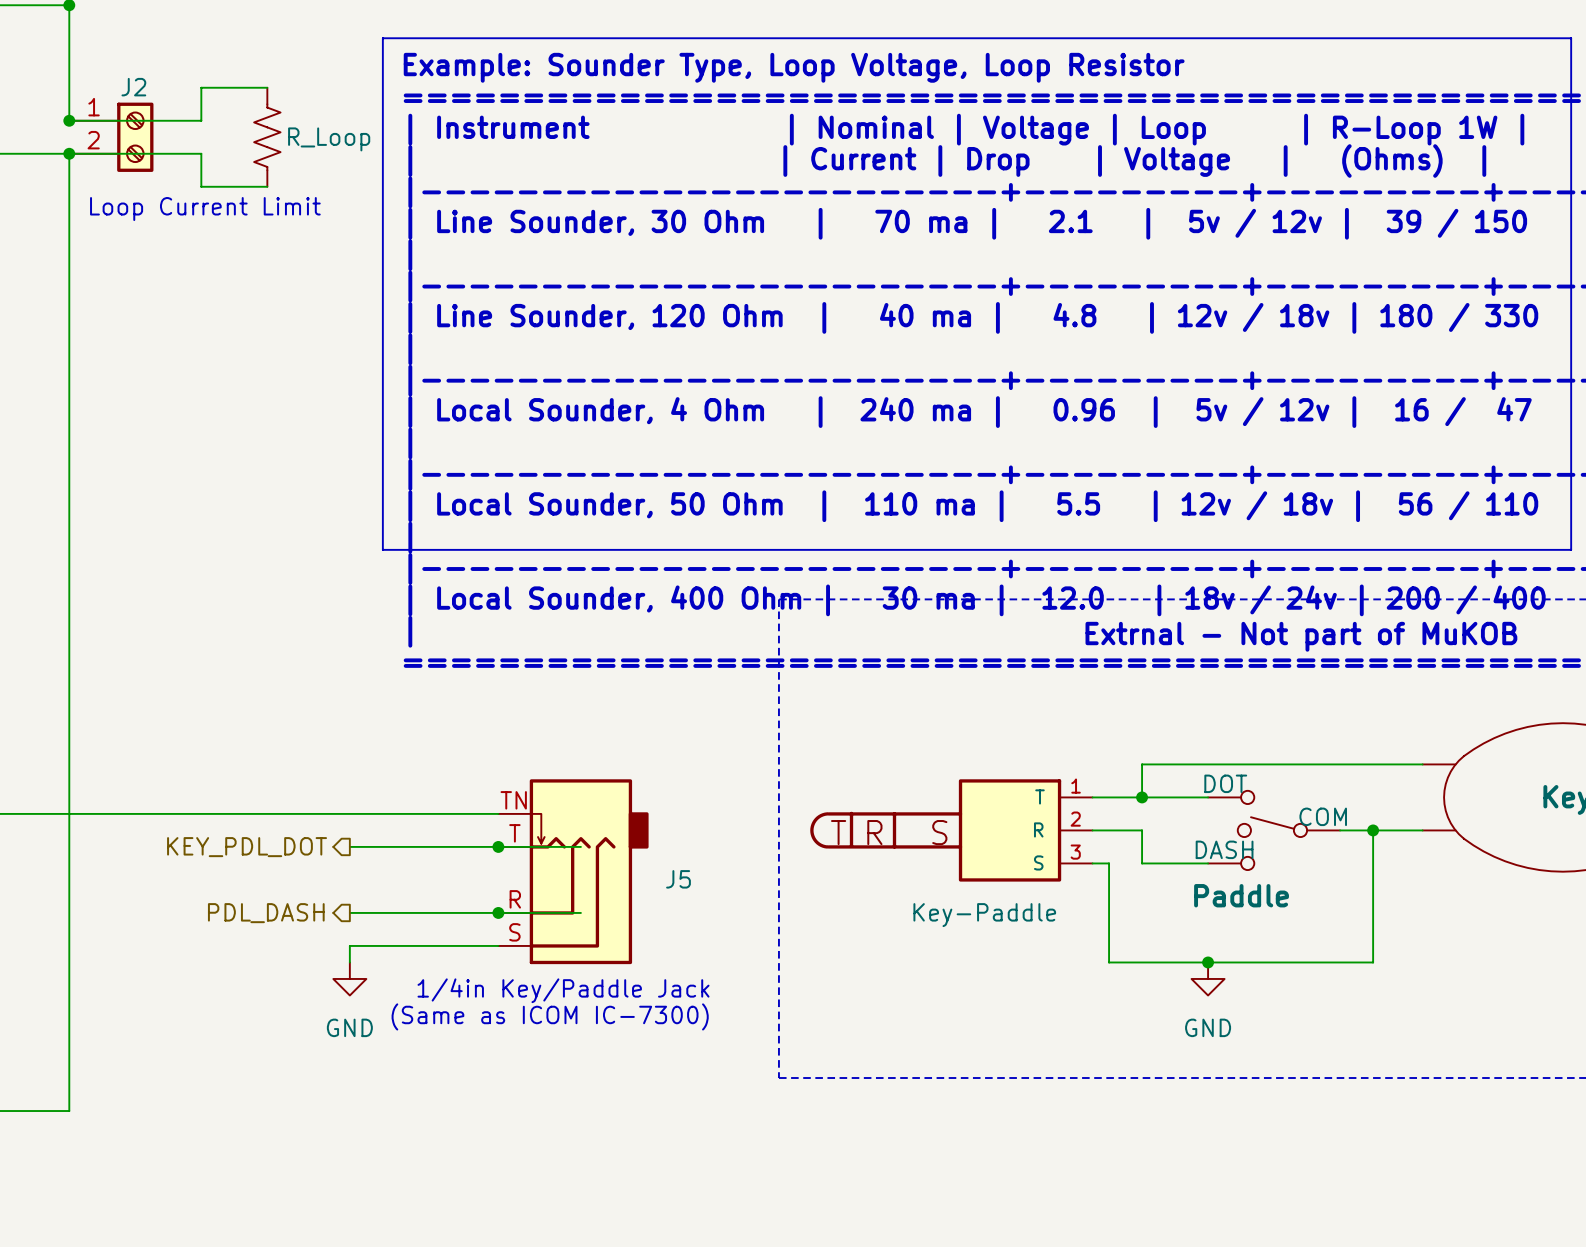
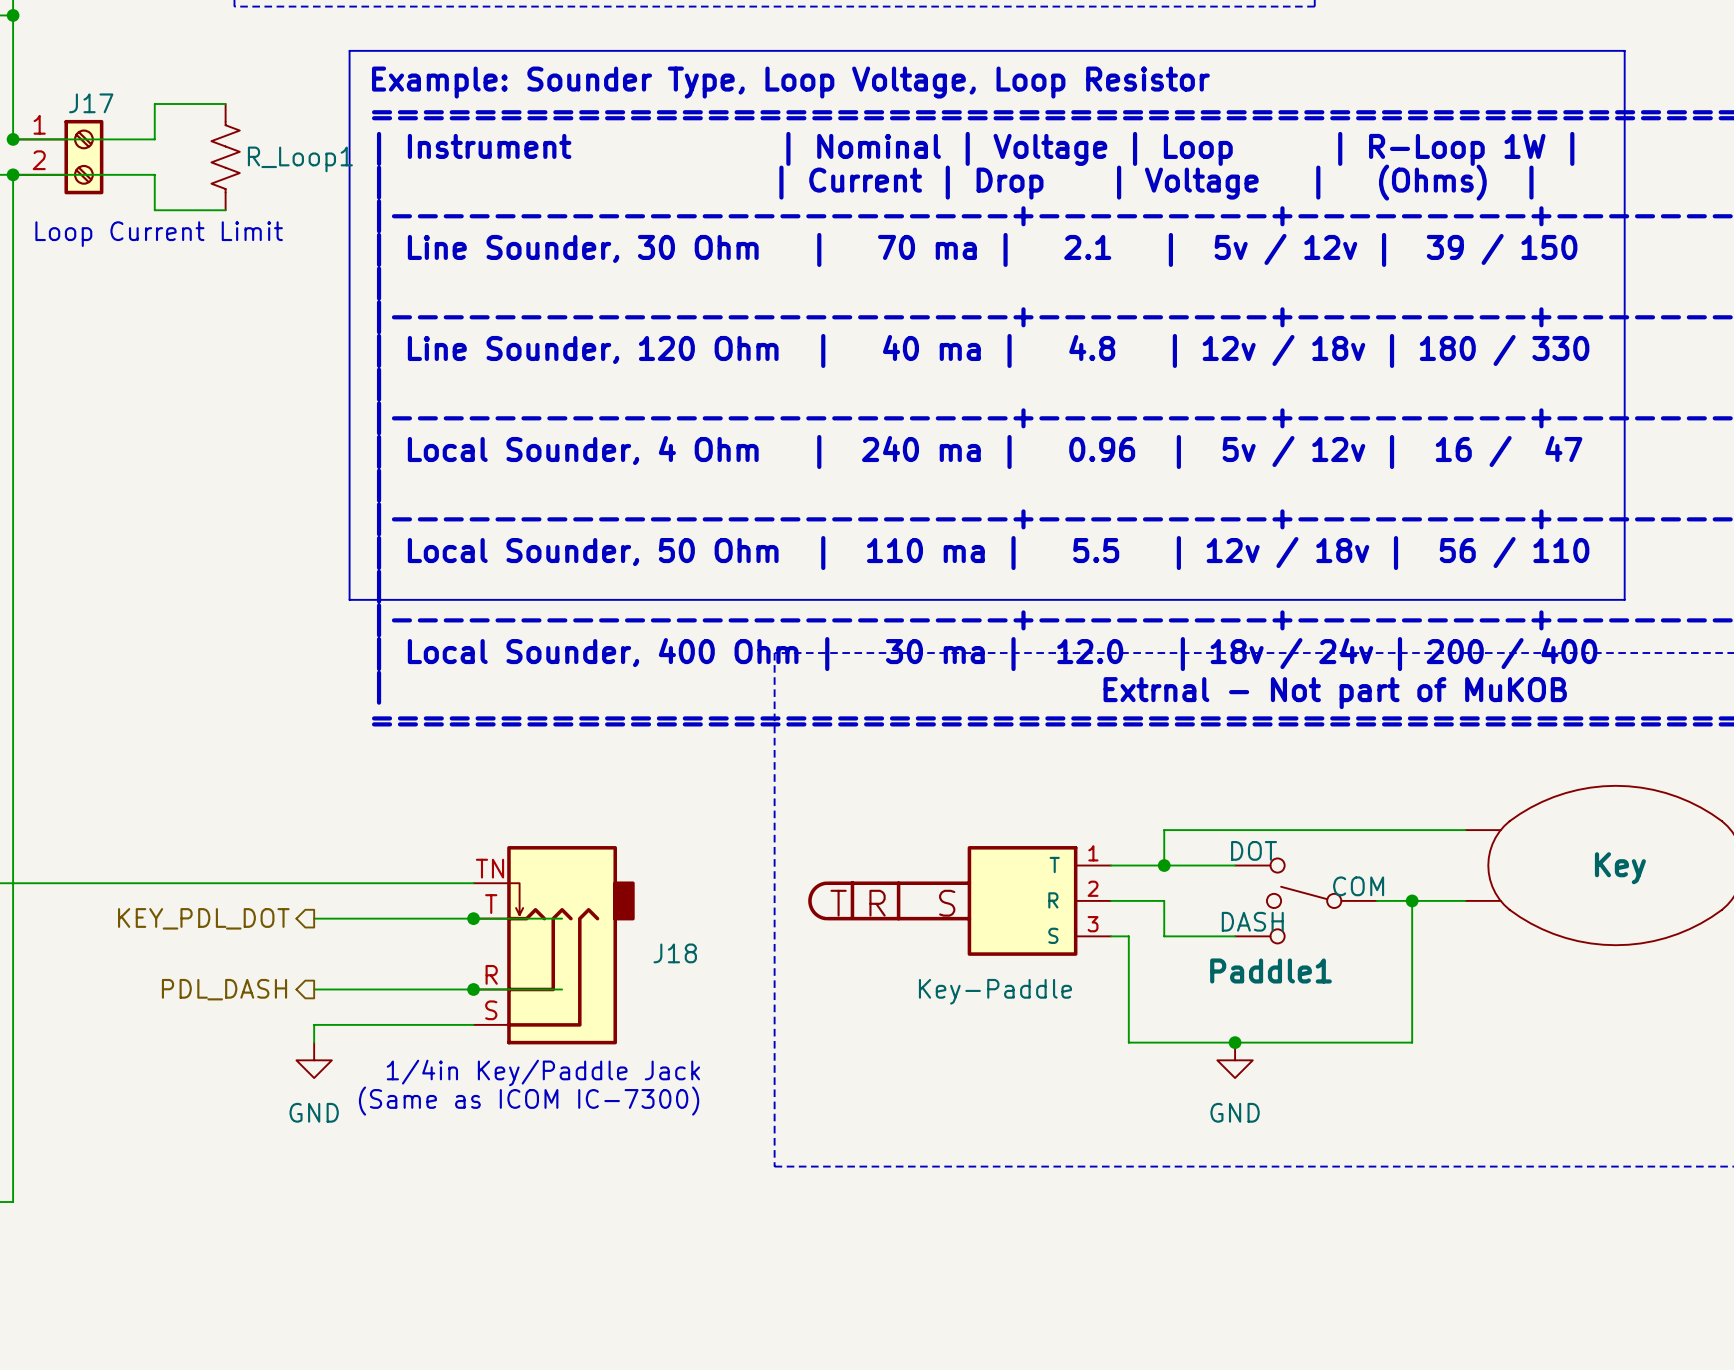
J2 name: J2 (133, 87) -> J17 (91, 103)
R_Loop name: R_Loop (329, 139) -> R_Loop1 (300, 159)
J5 name: J5 (678, 879) -> J18 (675, 953)
Paddle name: Paddle (1241, 895) -> Paddle1 (1270, 970)

